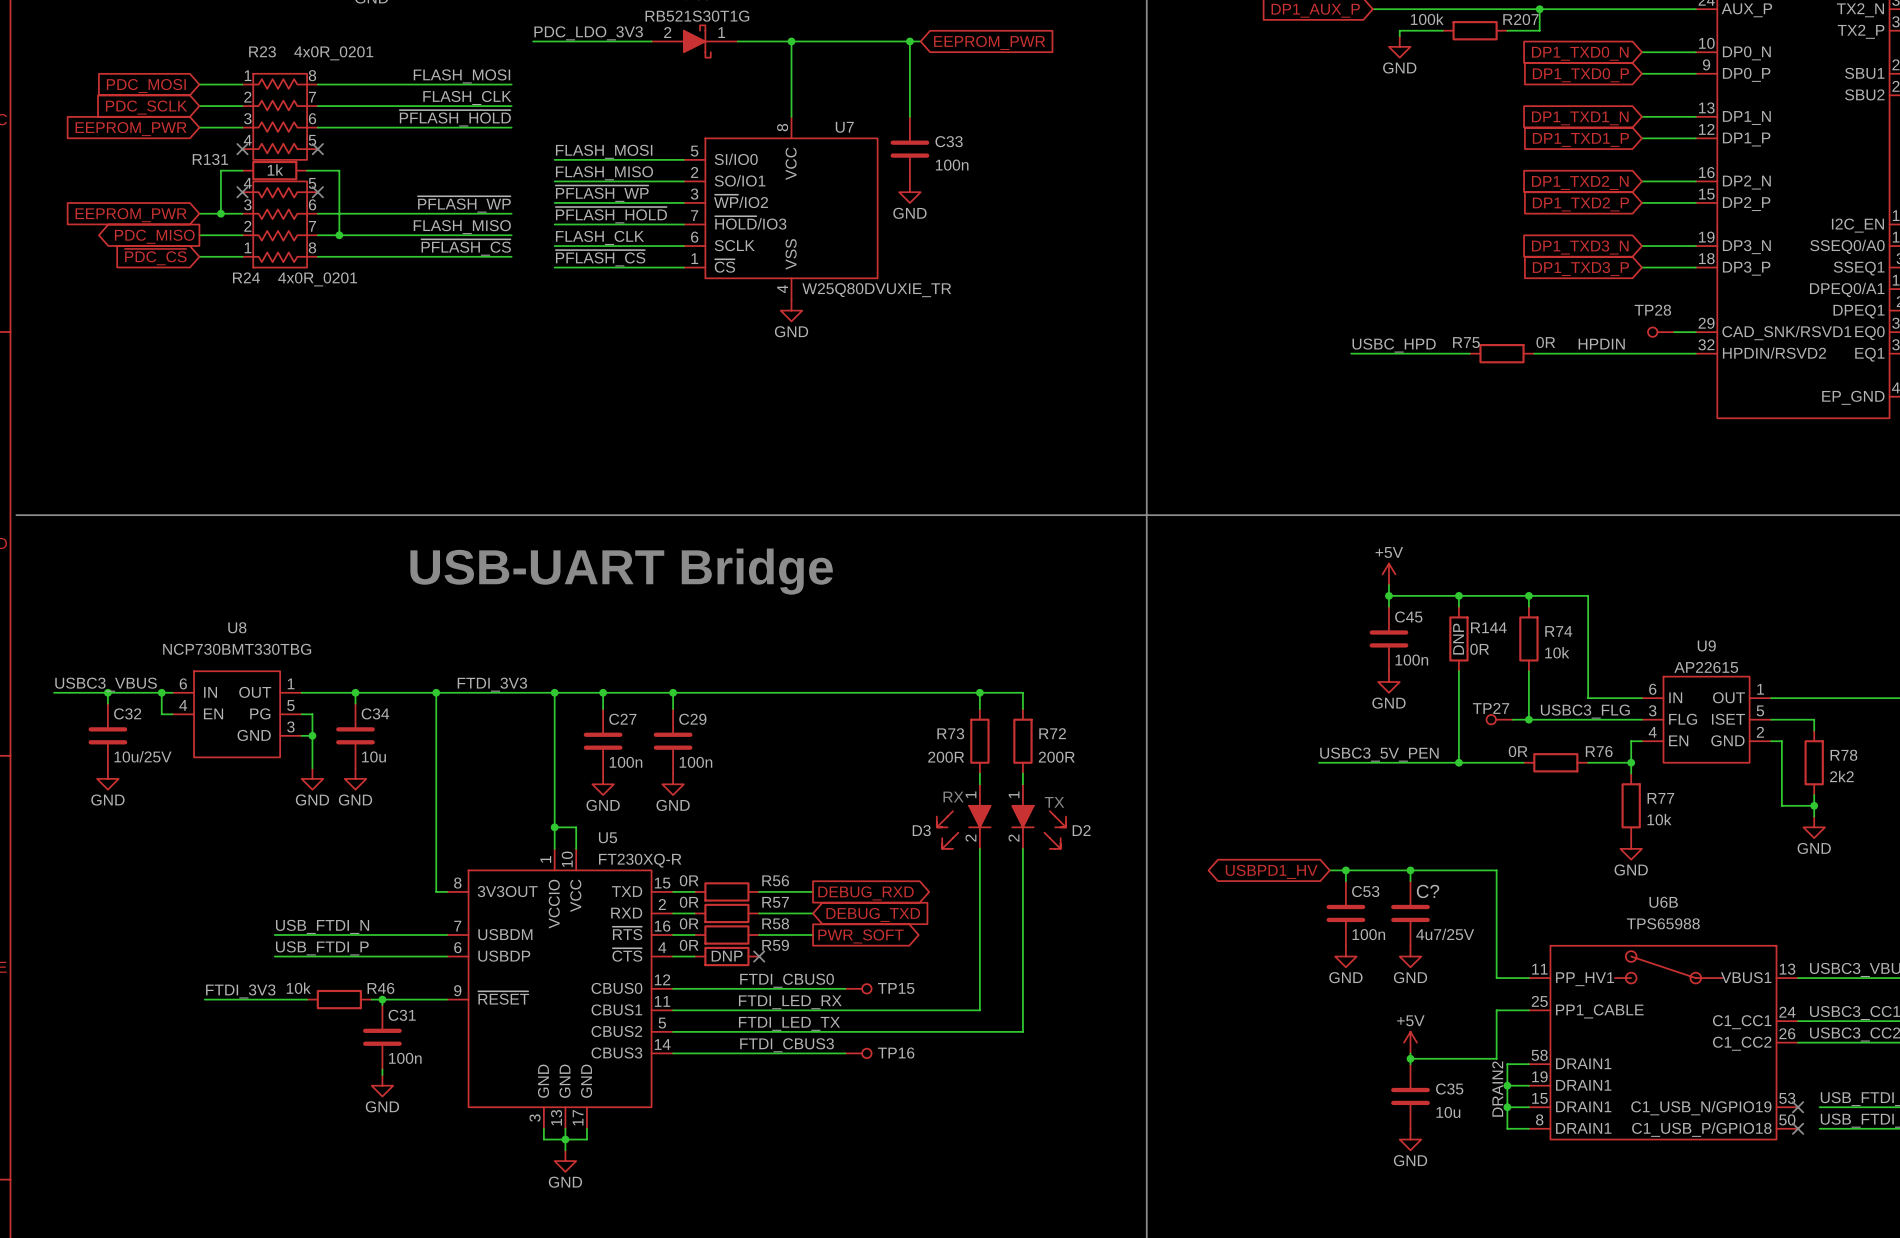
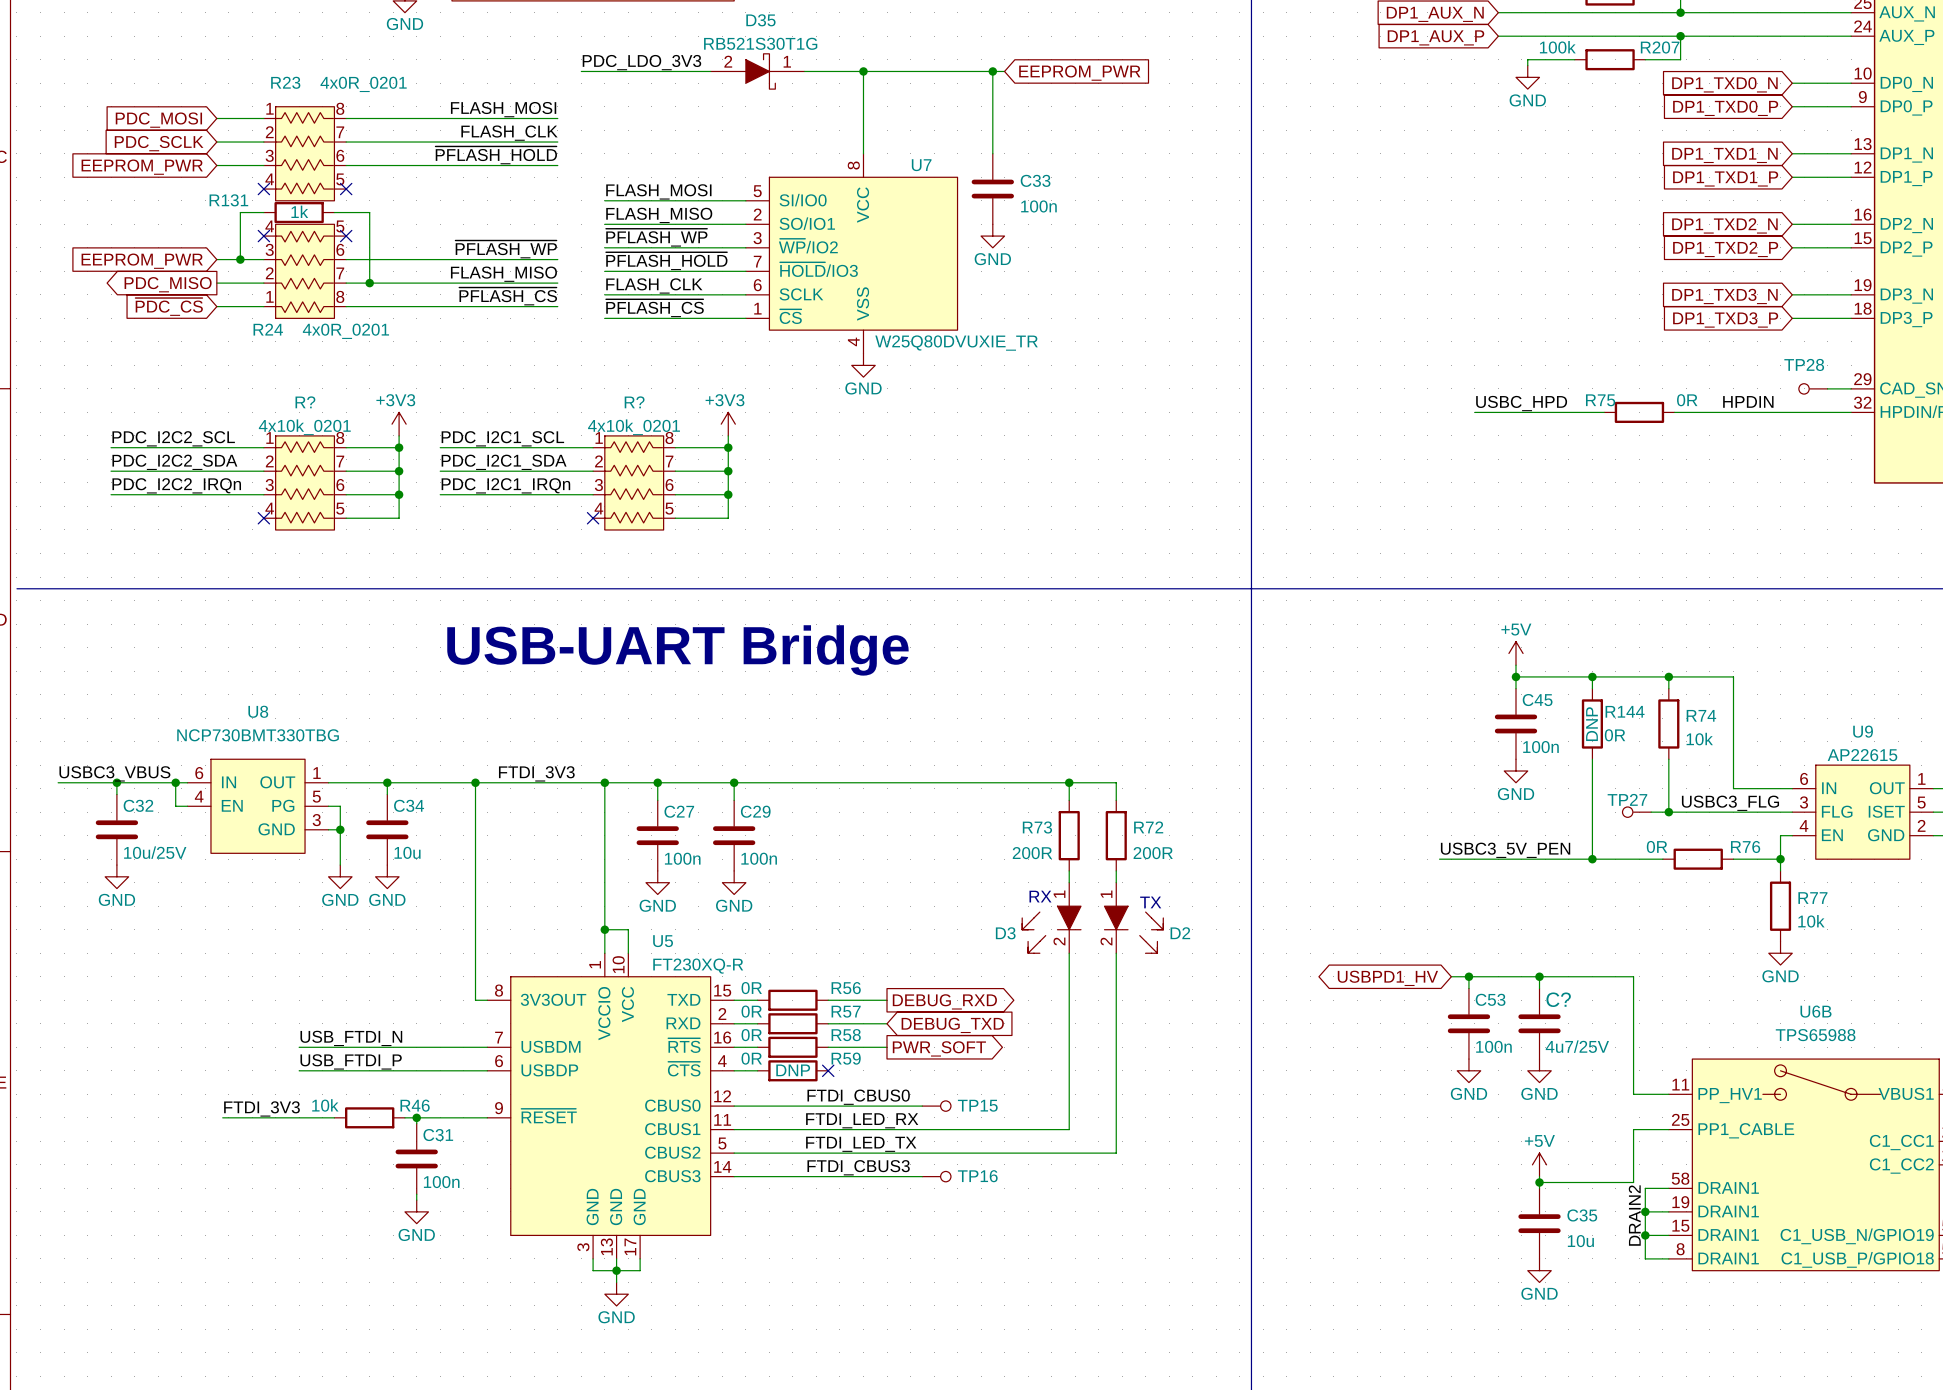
power symbol: none -> +3V3 (399, 424)
power symbol: none -> +3V3 (728, 424)
wire: none -> (399, 435) (399, 518) (346, 518)
wire: none -> (728, 435) (728, 518) (675, 518)
label: none -> PDC_I2C2_SCL (173, 438)
label: none -> PDC_I2C1_SCL (502, 438)
wire: none -> (111, 447) (263, 447)
wire: none -> (346, 447) (399, 447)
junction: none -> (399, 447)
wire: none -> (440, 447) (593, 447)
wire: none -> (675, 447) (728, 447)
junction: none -> (728, 447)
label: none -> PDC_I2C2_SDA (174, 462)
label: none -> PDC_I2C1_SDA (504, 462)
wire: none -> (111, 471) (263, 471)
wire: none -> (346, 471) (399, 471)
junction: none -> (399, 471)
wire: none -> (440, 471) (593, 471)
wire: none -> (675, 471) (728, 471)
junction: none -> (728, 471)
R?: none -> (305, 482)
R?: none -> (634, 482)
label: none -> PDC_I2C2_IRQn (176, 485)
label: none -> PDC_I2C1_IRQn (505, 485)
wire: none -> (111, 494) (263, 494)
wire: none -> (346, 494) (399, 494)
junction: none -> (399, 494)
wire: none -> (440, 494) (593, 494)
wire: none -> (675, 494) (728, 494)
junction: none -> (728, 494)
no-connect mark: none -> (263, 518)
no-connect mark: none -> (593, 518)

